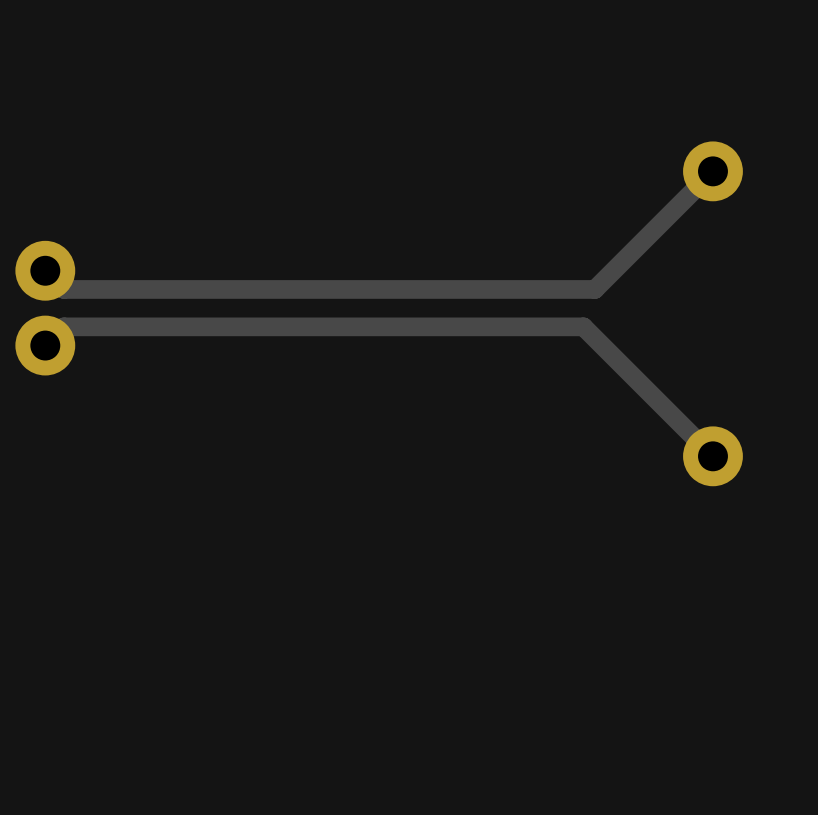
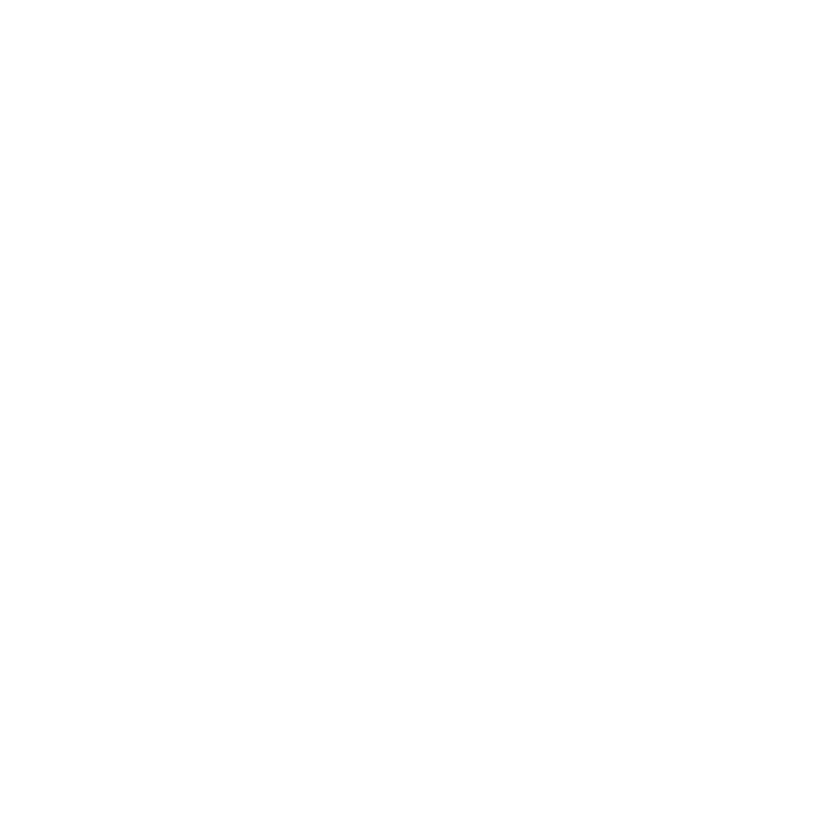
track: (712, 171) (594, 289) (64, 289) (45, 270) -> none
via: (712, 171) -> none
via: (45, 270) -> none
track: (45, 345) (64, 326) (583, 326) (712, 456) -> none
via: (45, 345) -> none
via: (712, 456) -> none

